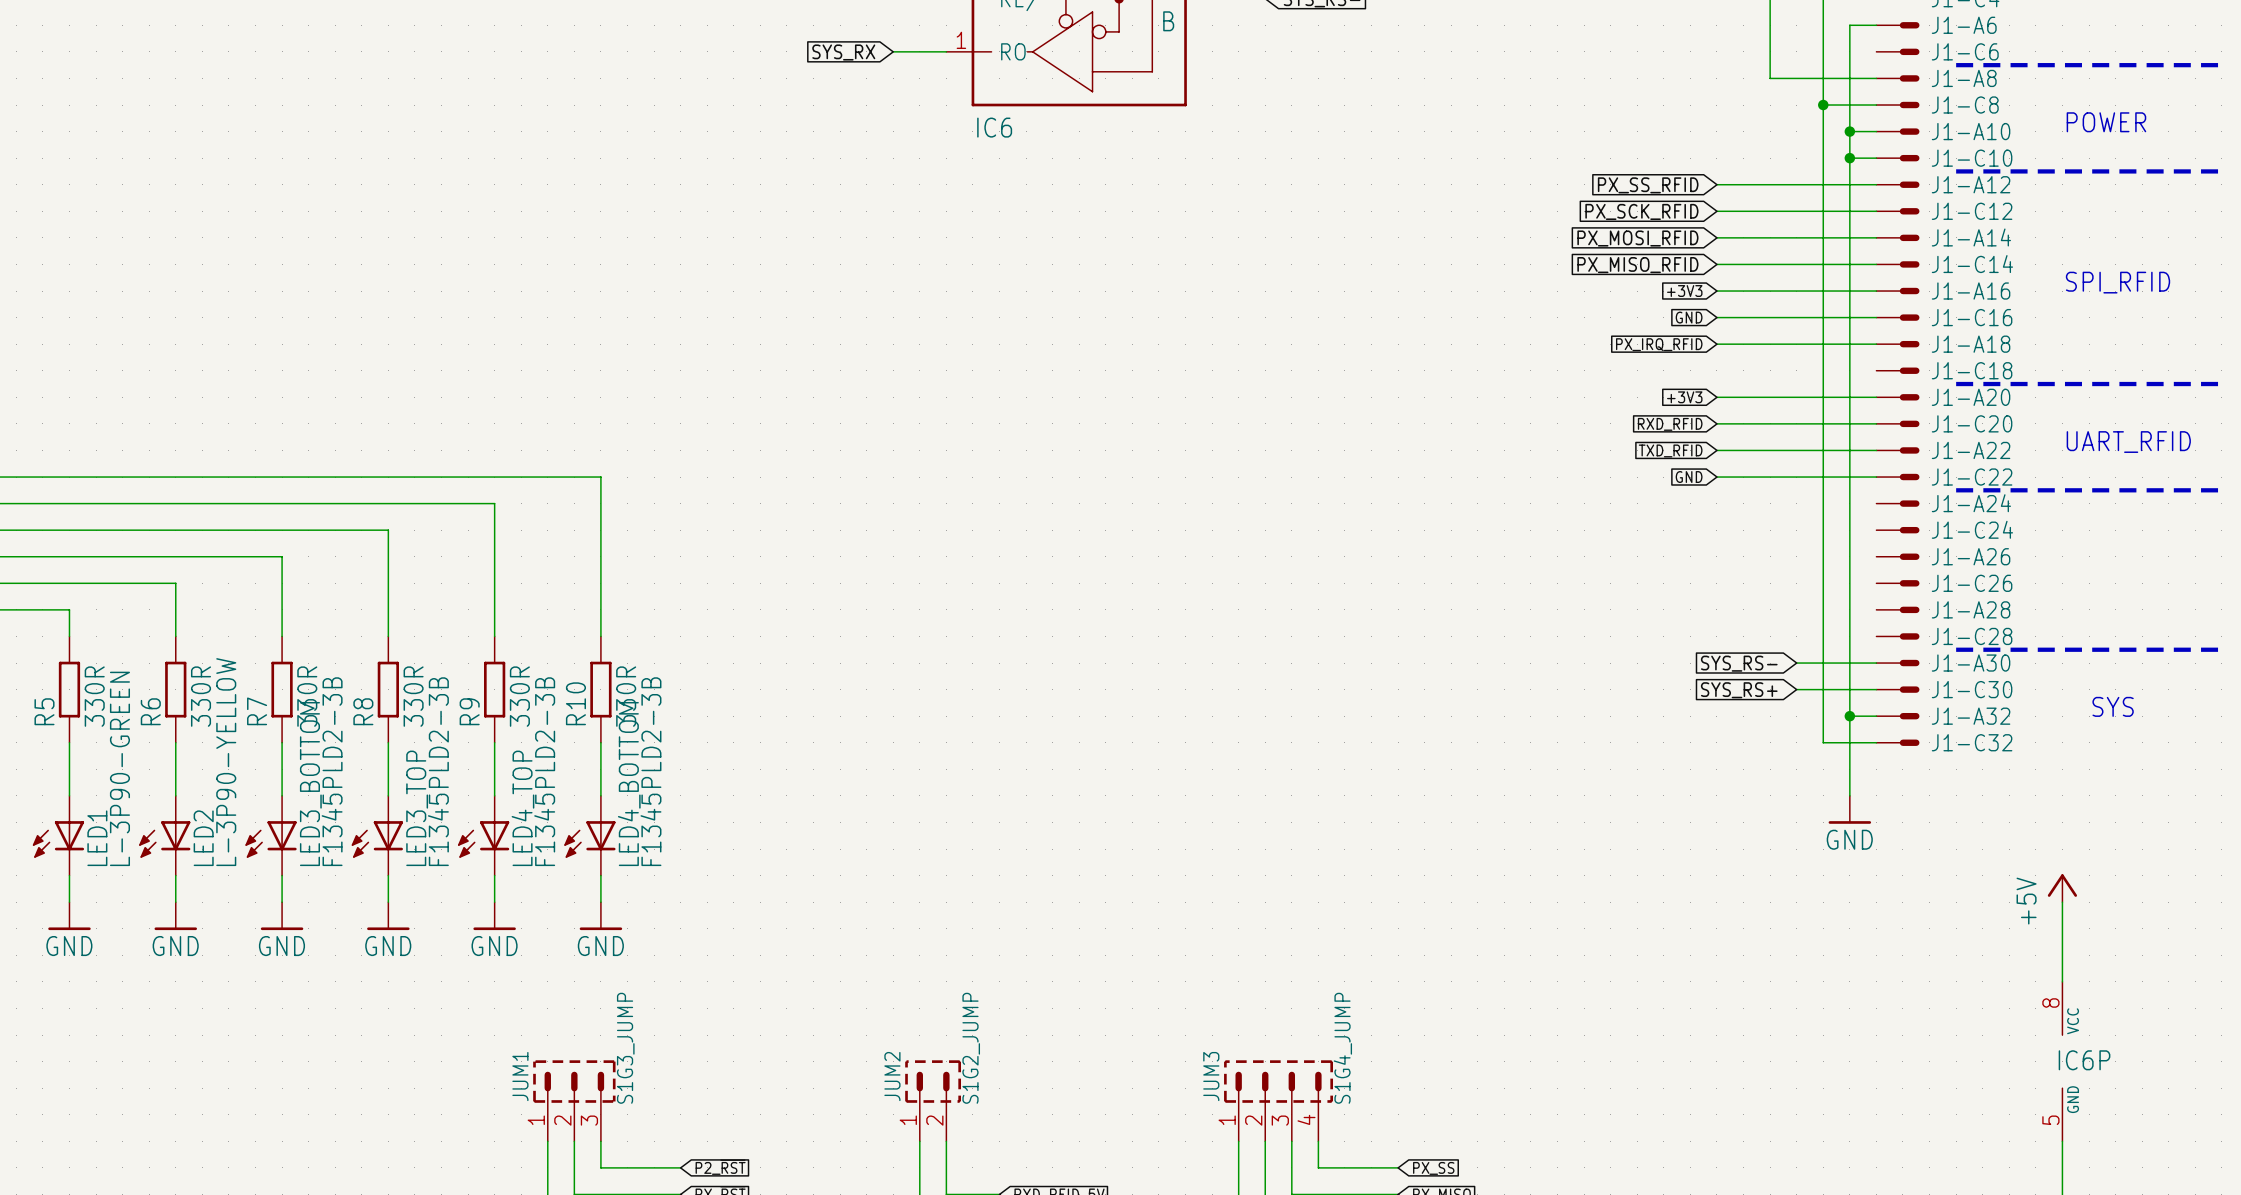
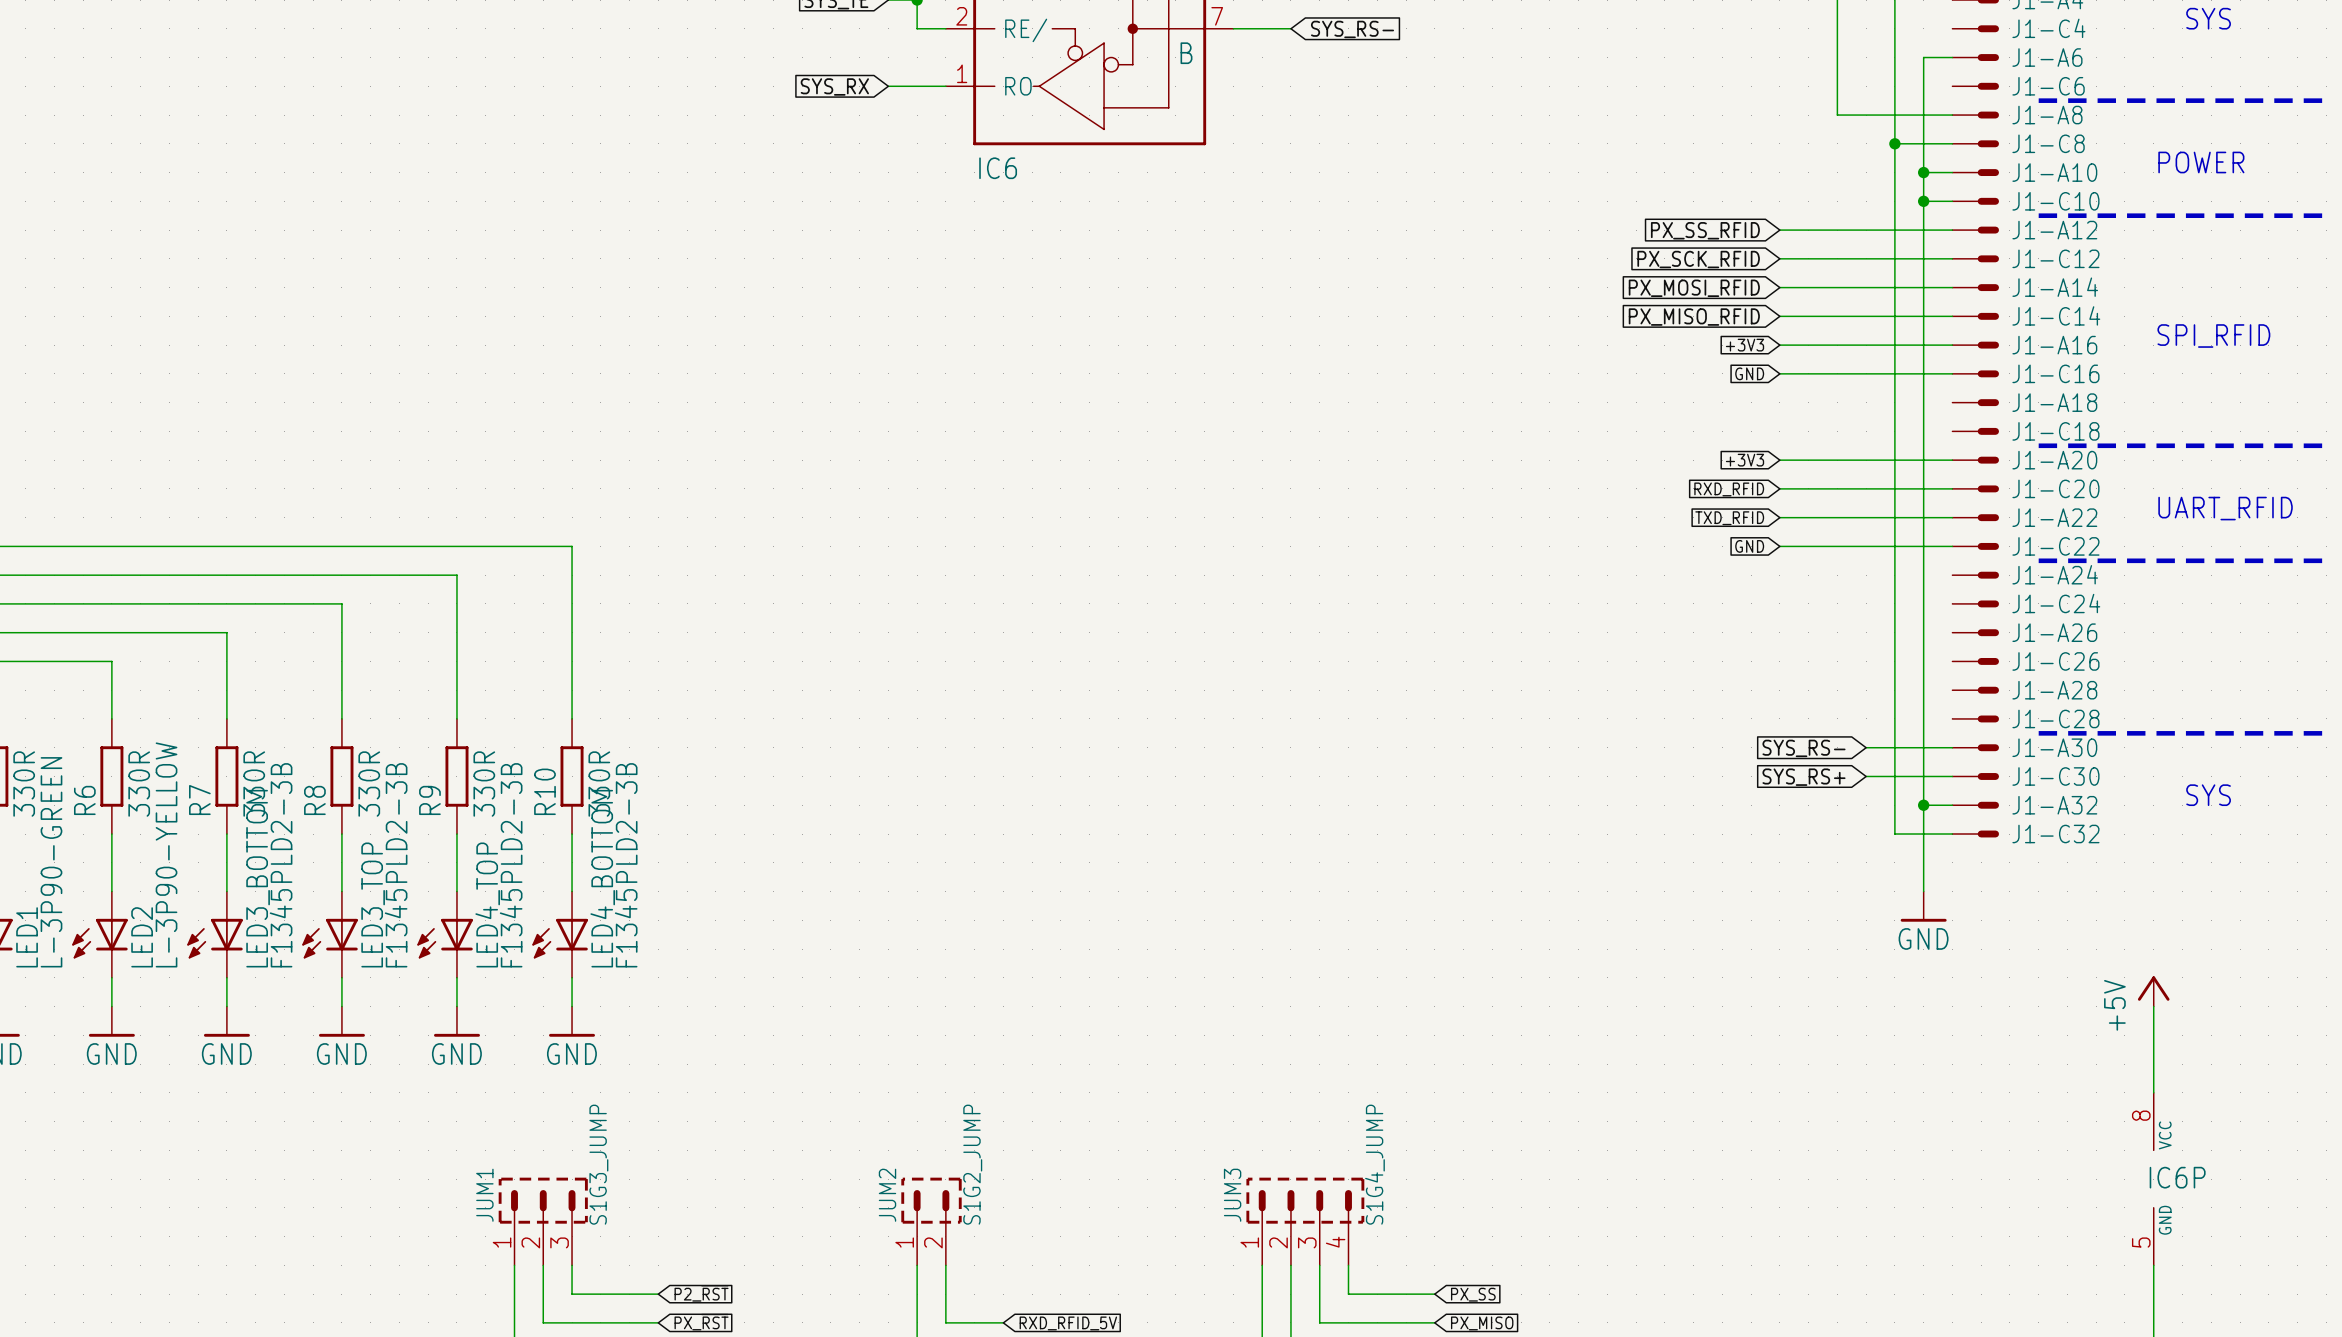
global label: PX_IRQ_RFID (1659, 344) -> none
wire: (1716, 344) (1876, 344) -> none

